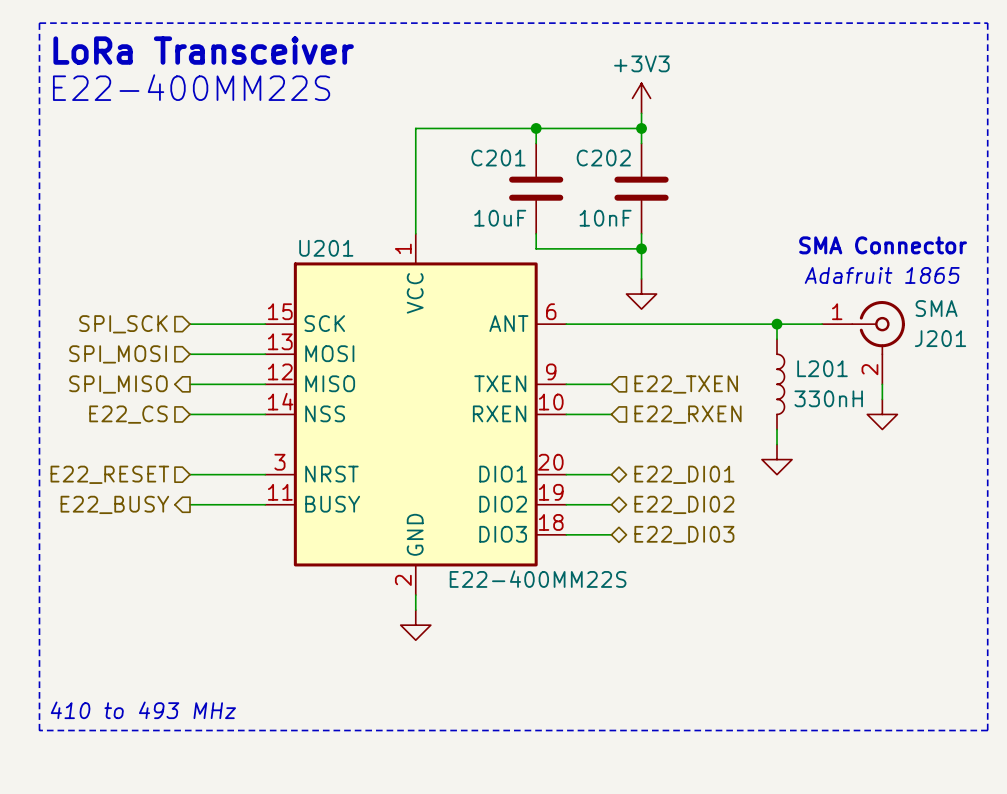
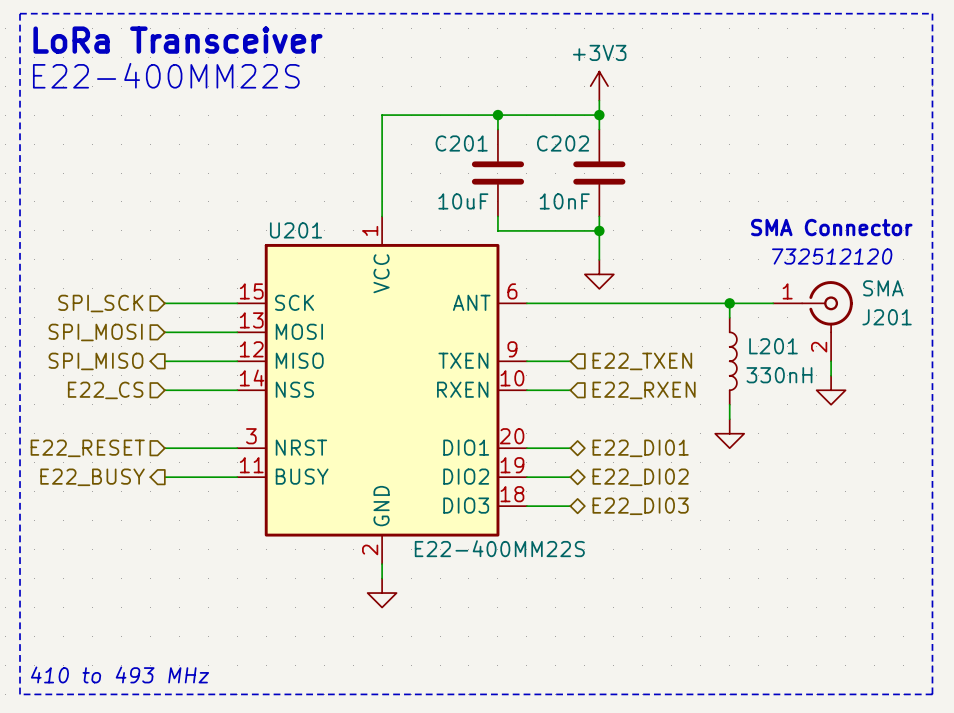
text: Adafruit 1865 (882, 275) -> 732512120 (832, 256)

